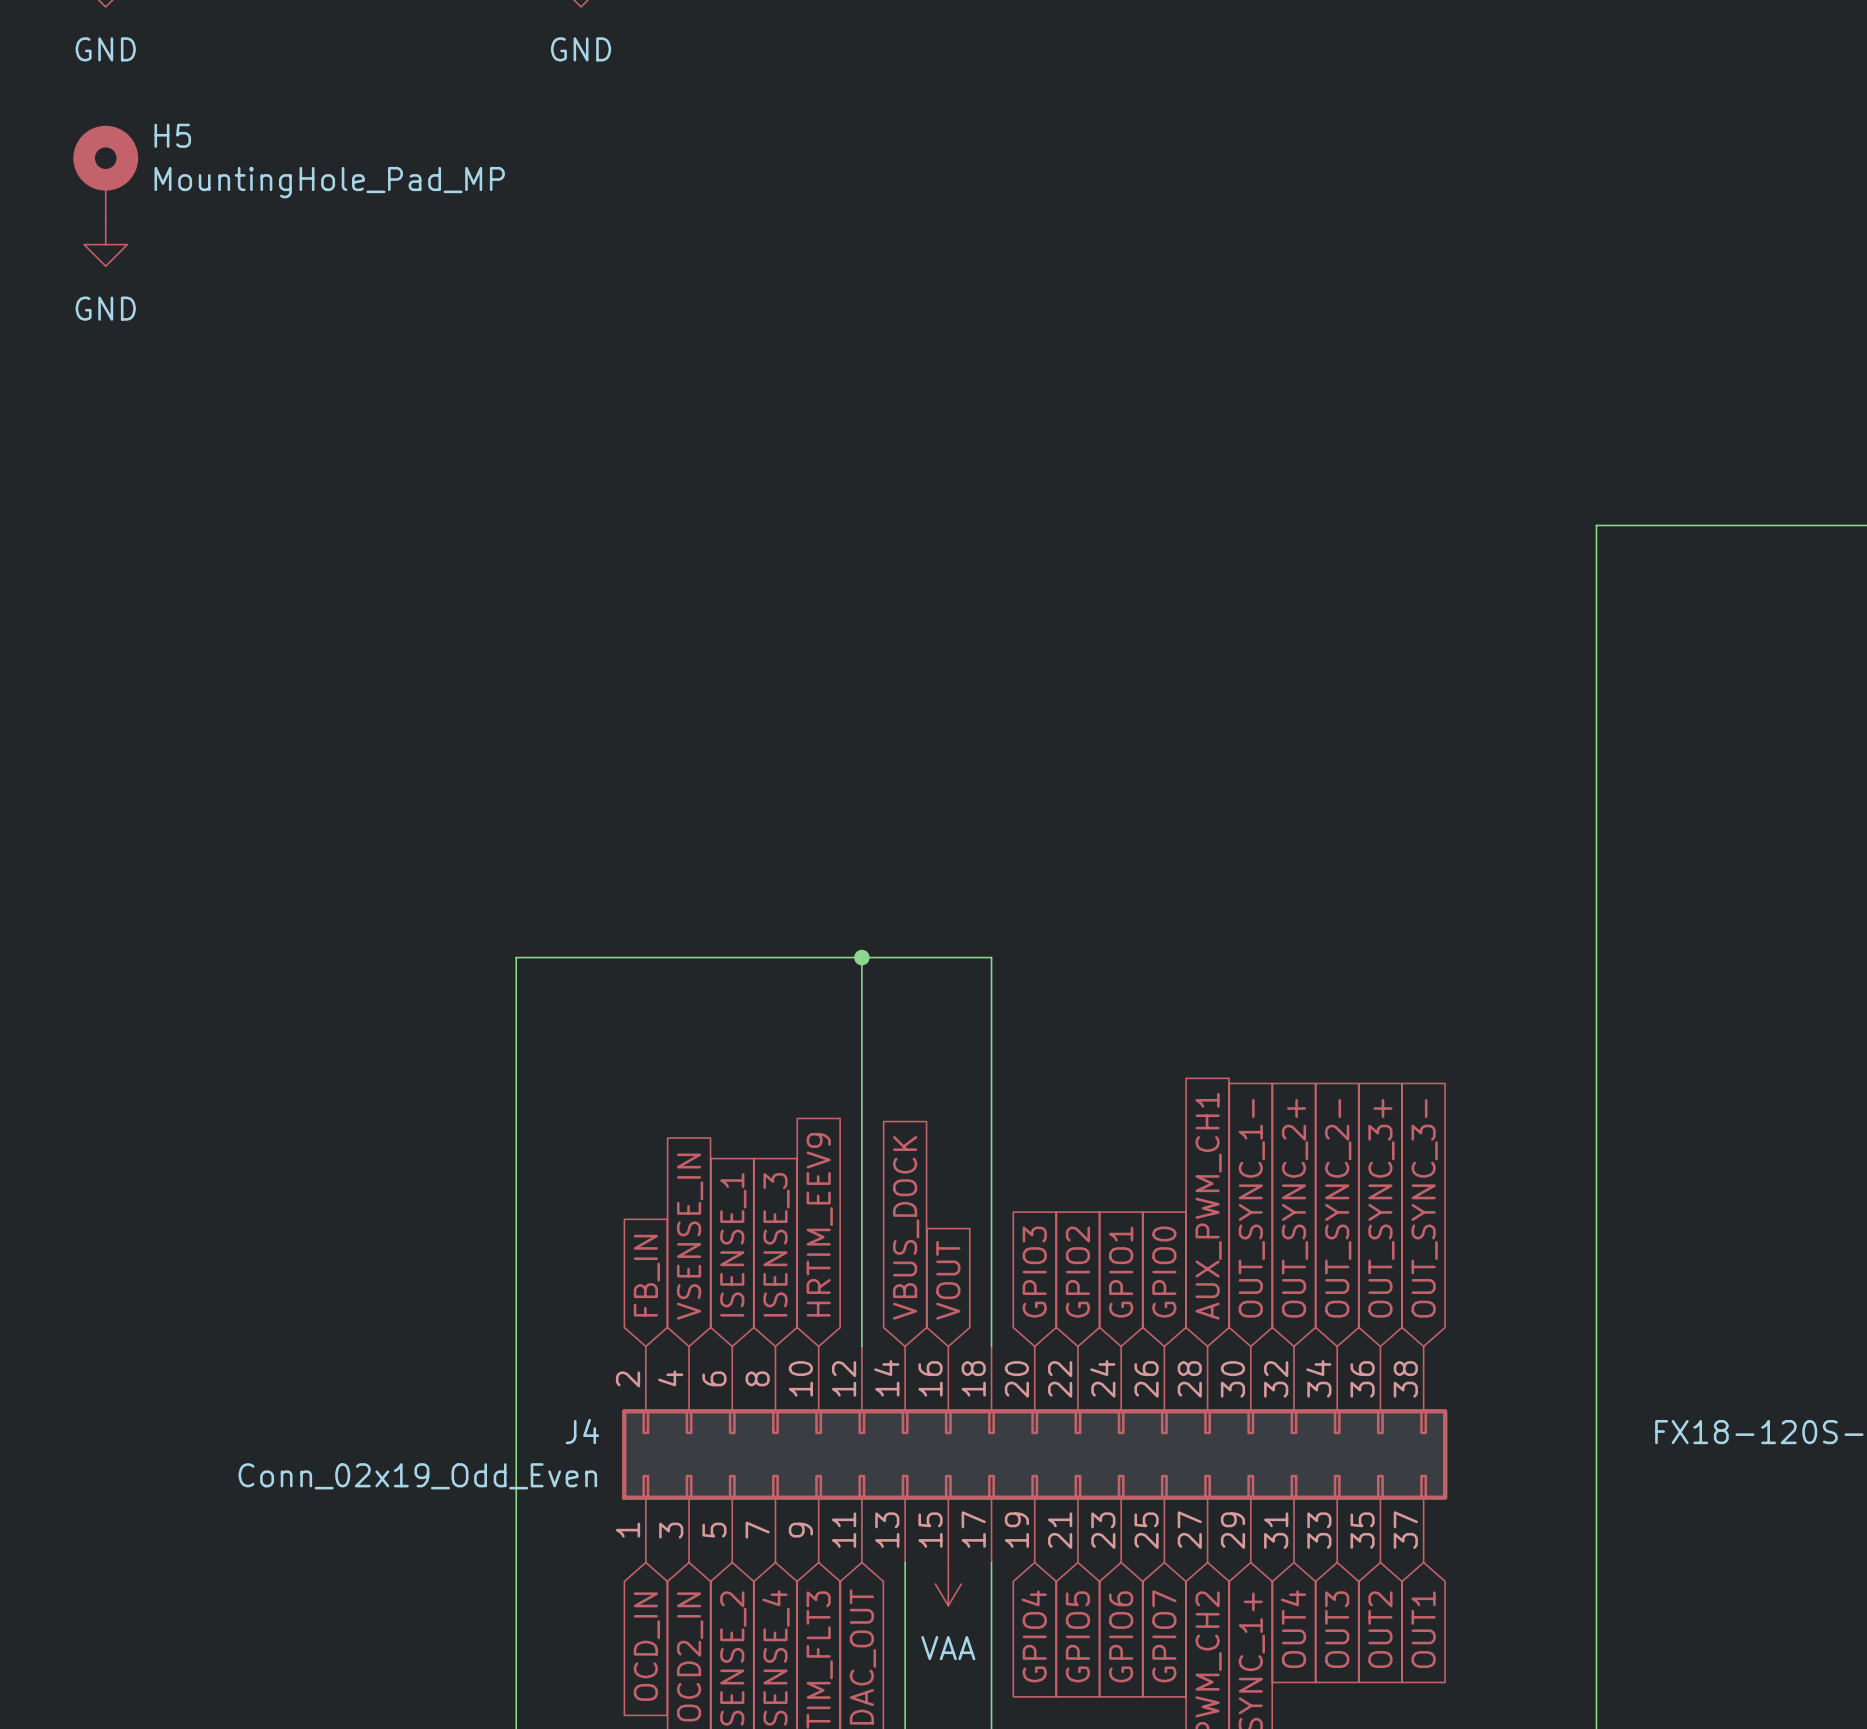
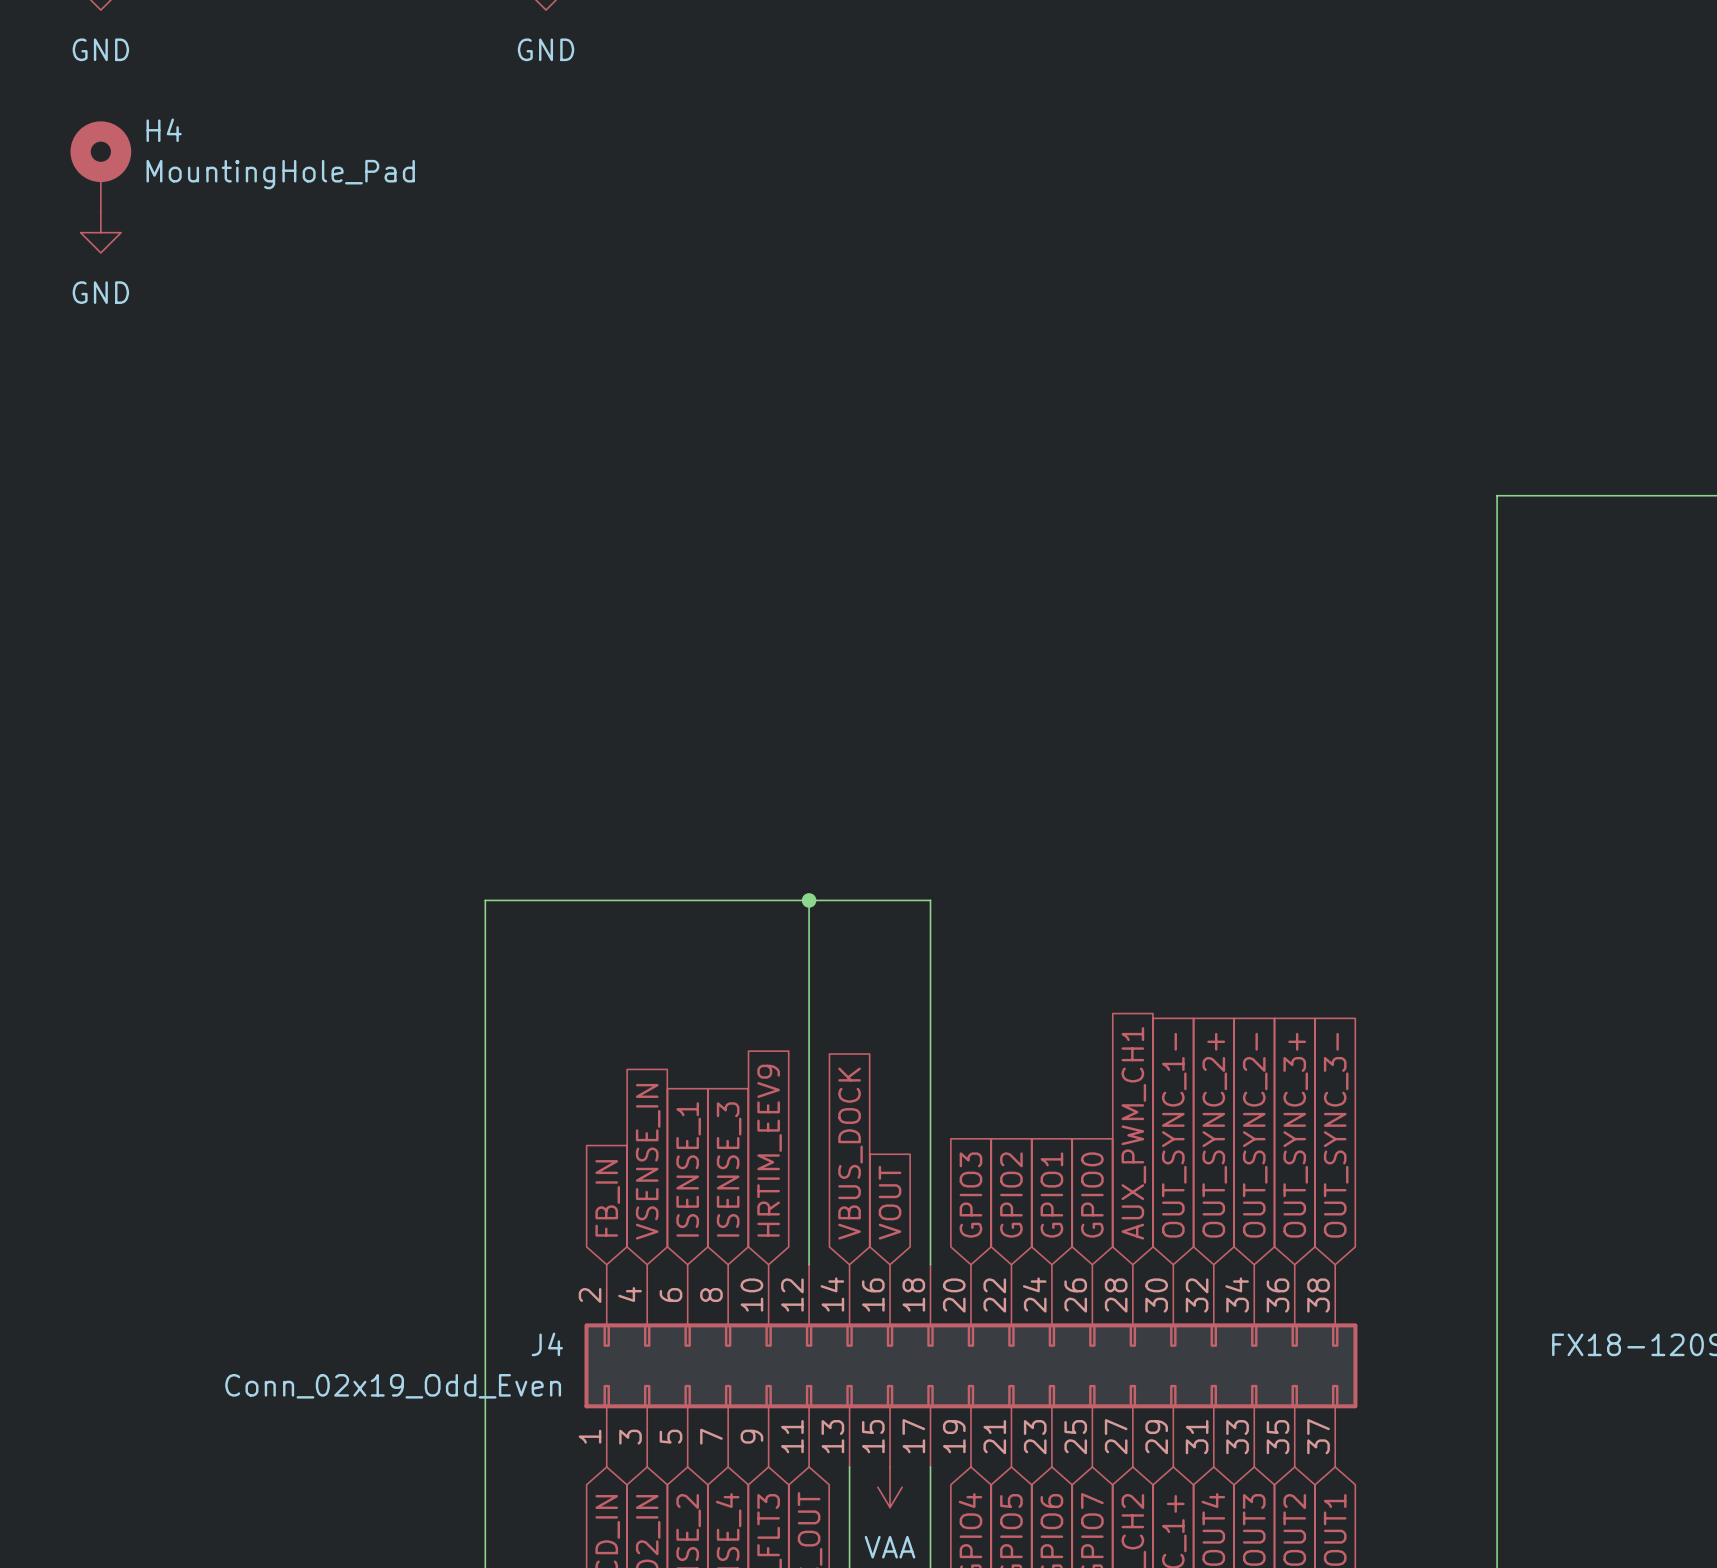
H5 name: H5 (172, 135) -> H4 (164, 130)
H5 value: MountingHole_Pad_MP (329, 182) -> MountingHole_Pad (280, 174)

